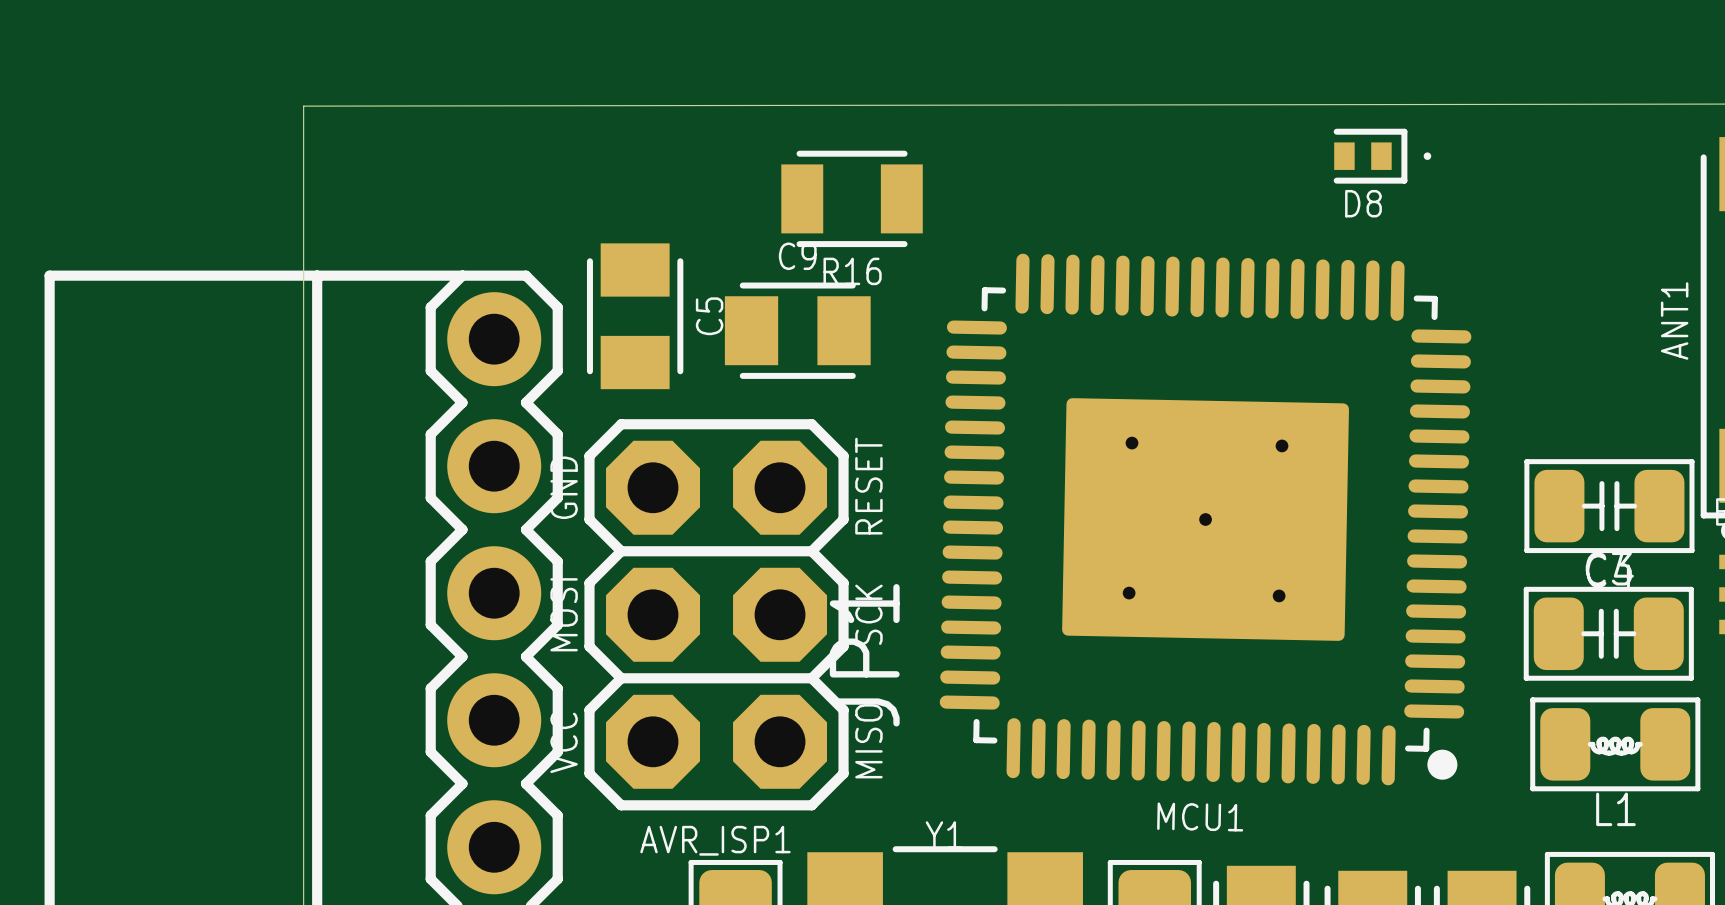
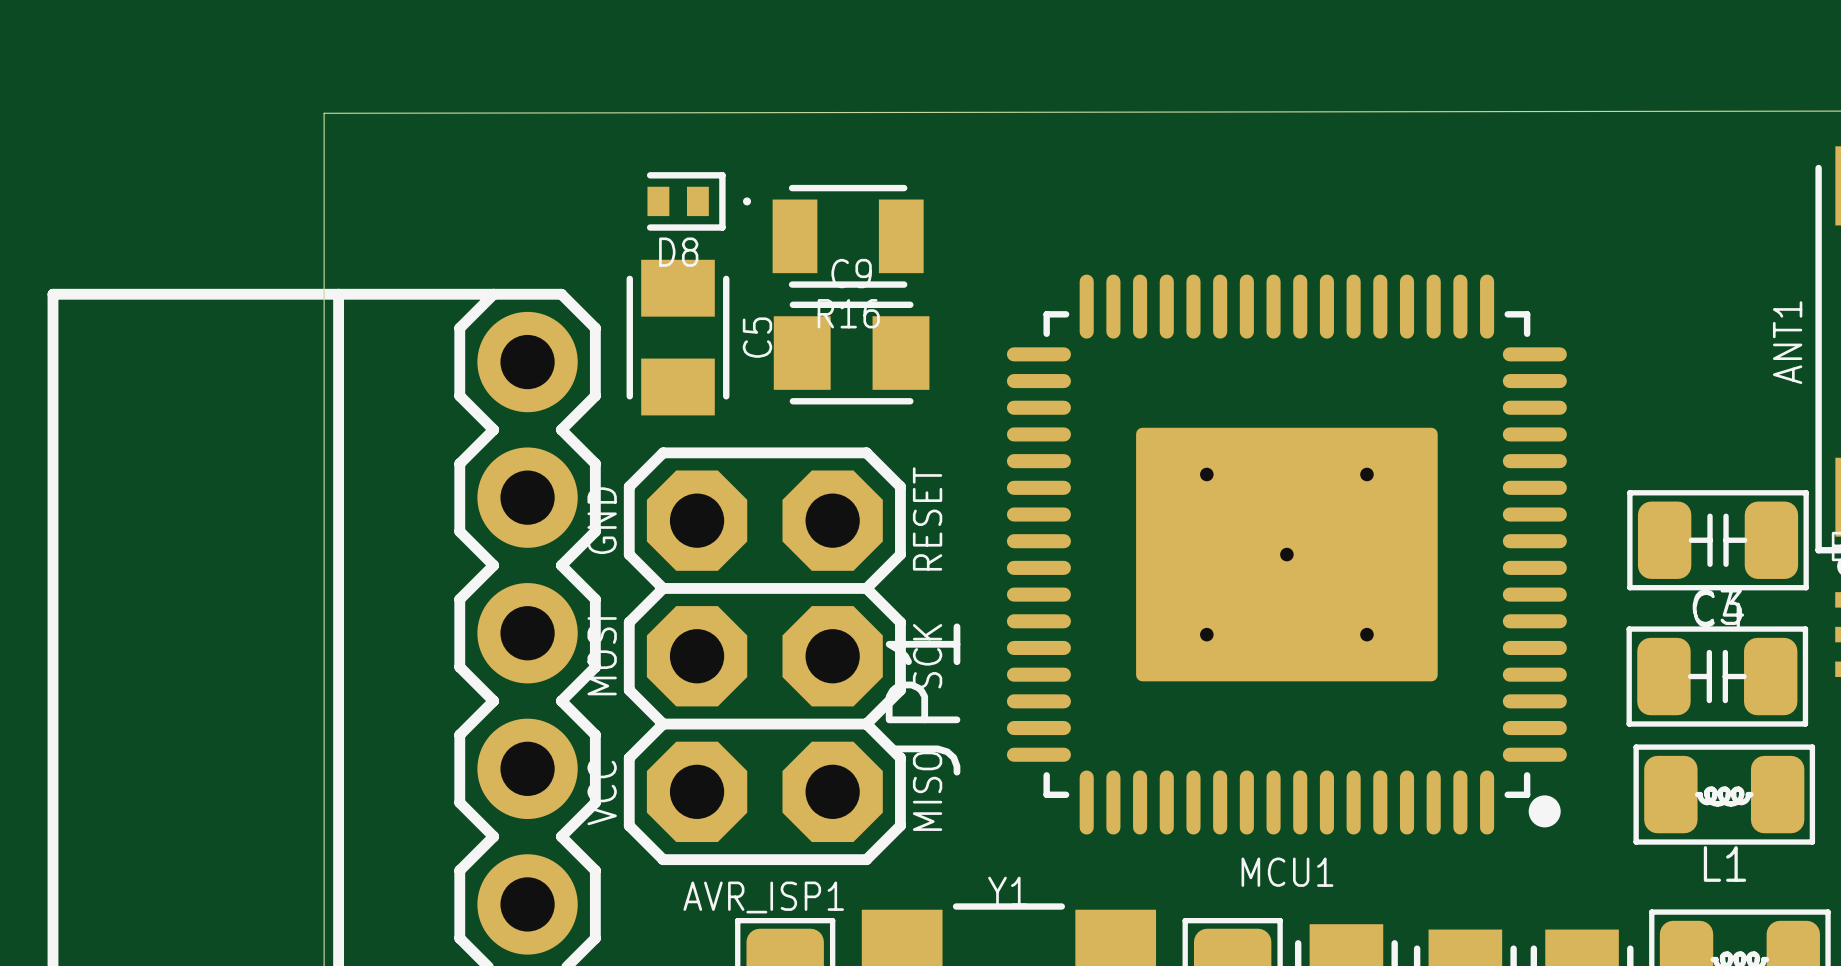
D8 position: (1382, 156) -> (698, 201)
R16 position: (852, 198) -> (848, 236)
MCU1 rotation: 0° (1205, 519) -> 1.1° counterclockwise (1286, 554)

